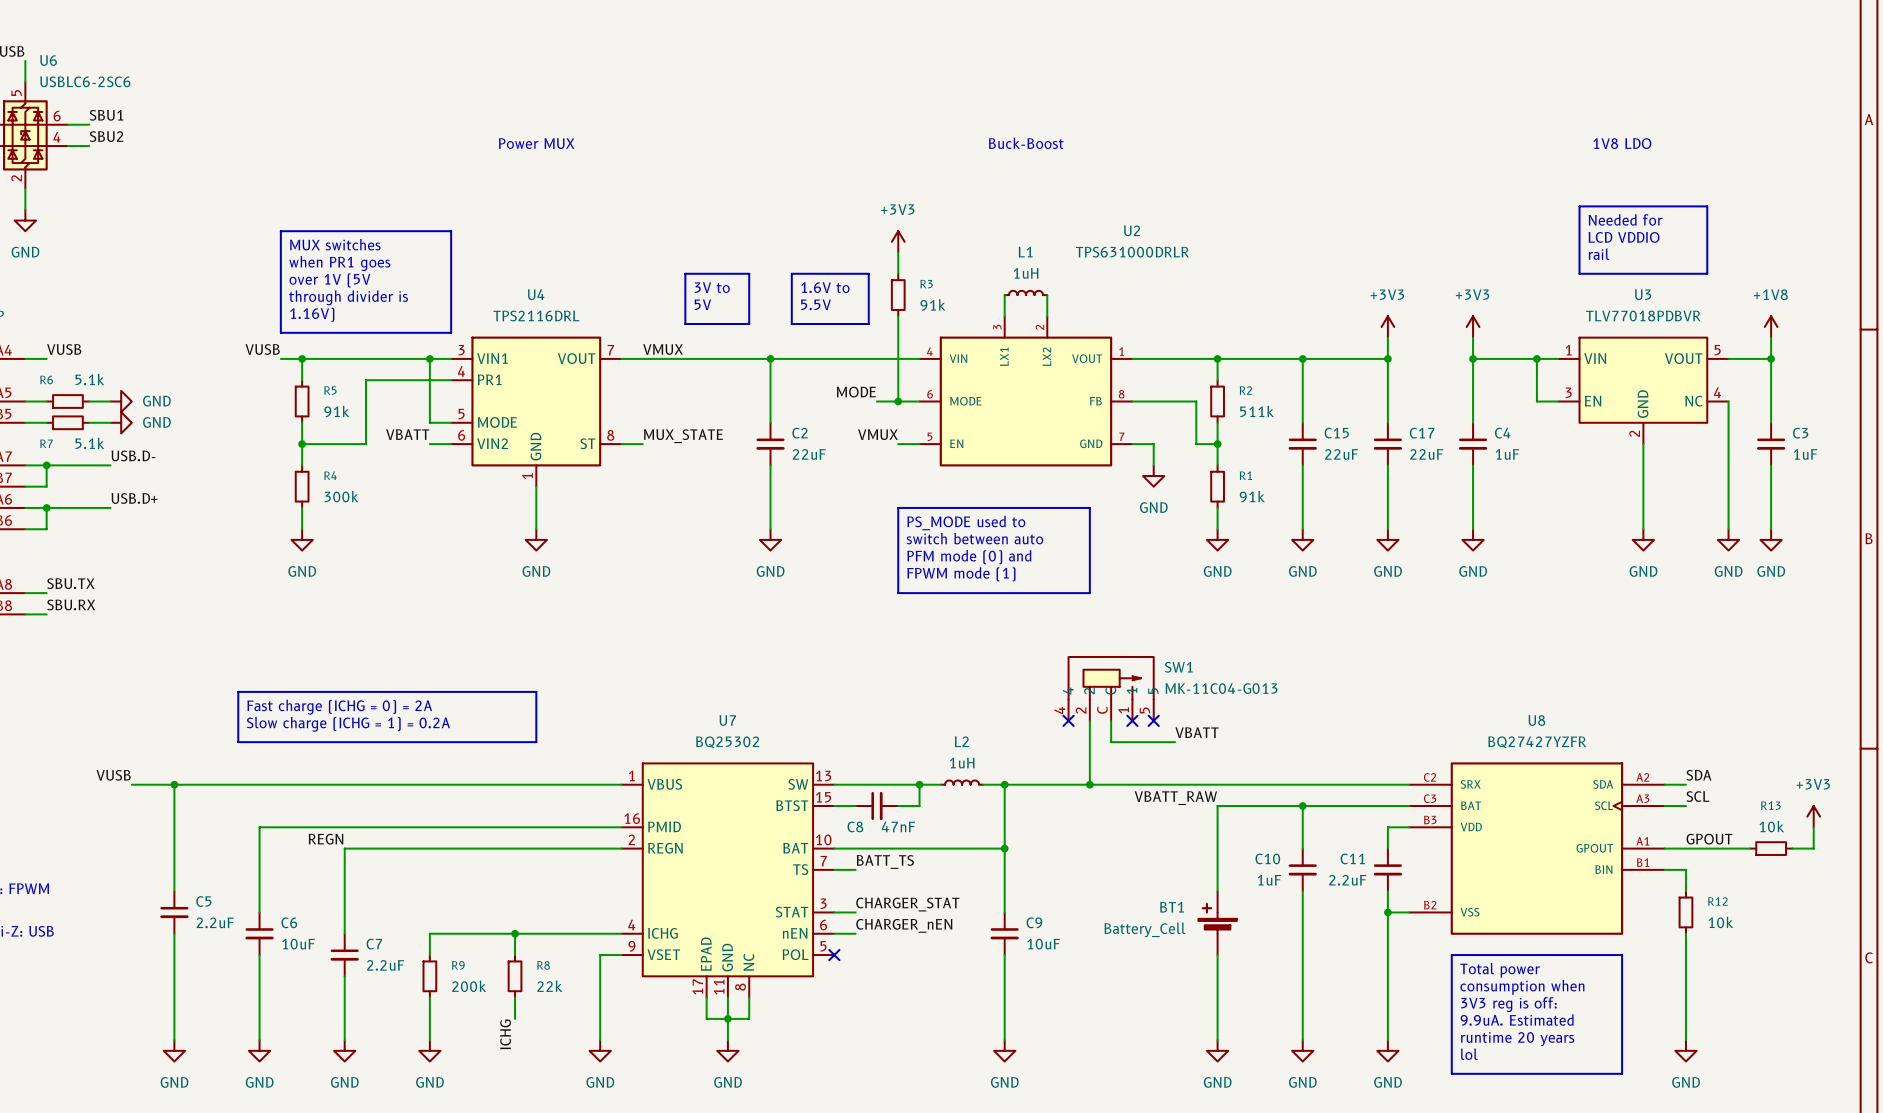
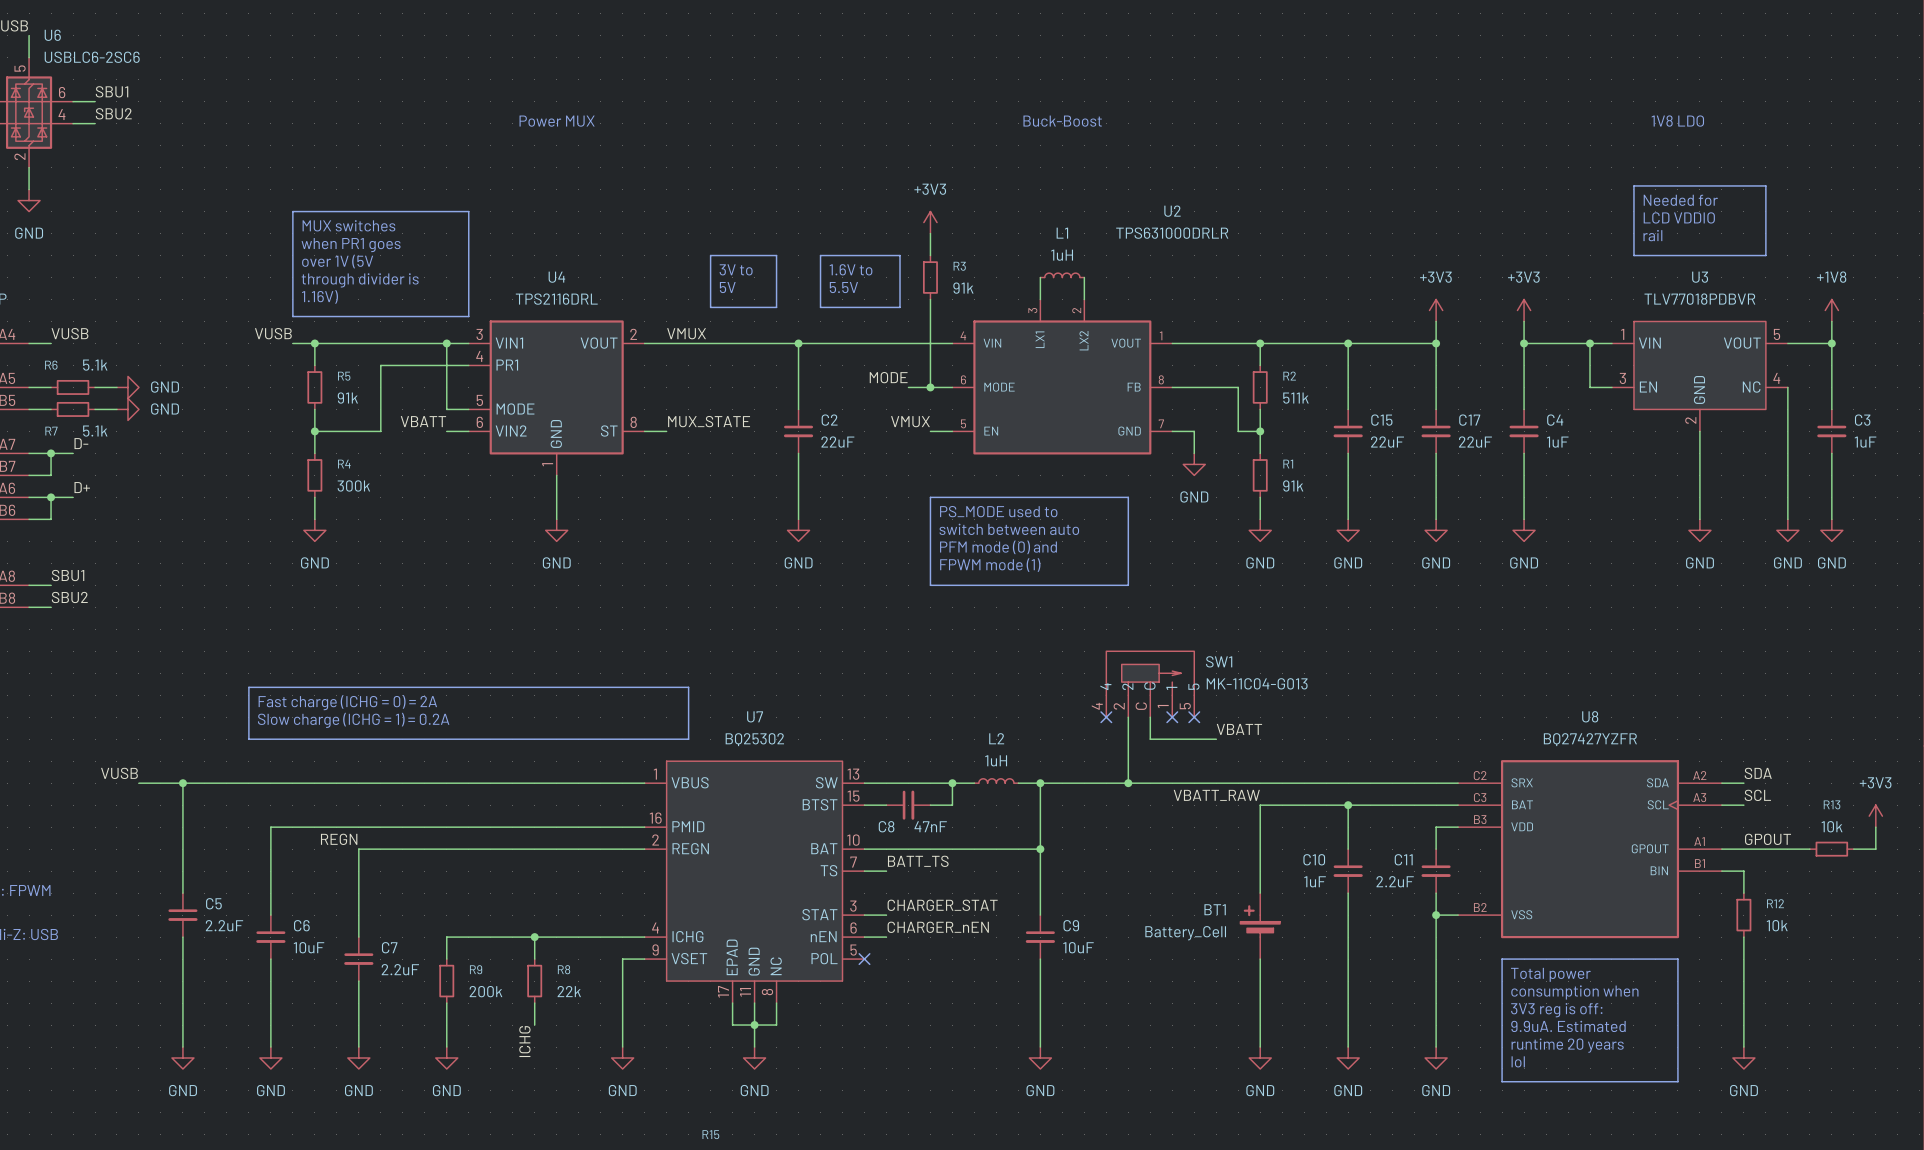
U4 pin number: 7 (610, 350) -> 2 (633, 334)
label: none -> D- (81, 443)
label: USB.D- (133, 455) -> none
wire: (67, 465) (110, 465) -> none
label: none -> D+ (82, 487)
label: USB.D+ (134, 498) -> none
wire: (67, 507) (110, 507) -> none
label: SBU.TX (70, 583) -> SBU1 (68, 575)
label: SBU.RX (71, 604) -> SBU2 (69, 597)
line: (536, 691) (536, 742) -> (556, 687) (688, 687) (688, 739) (556, 739)

